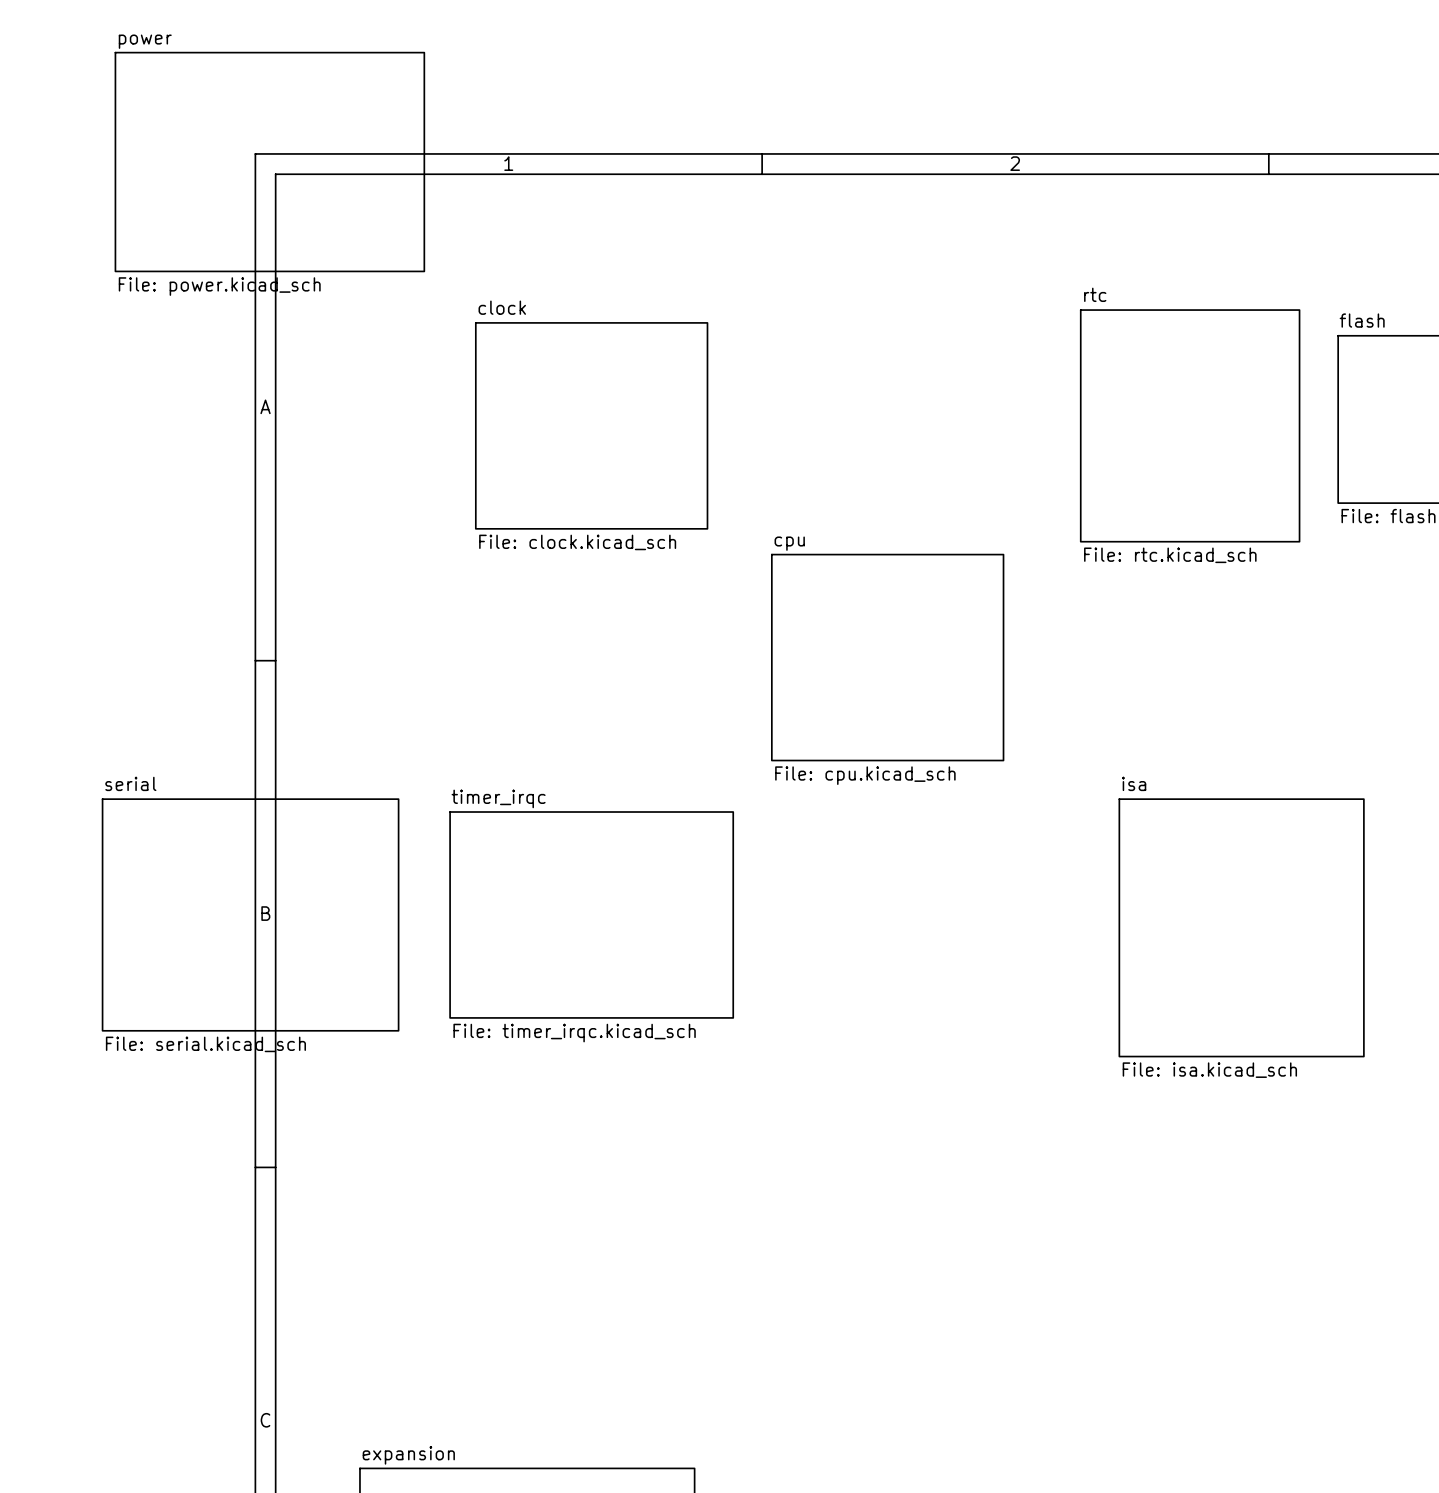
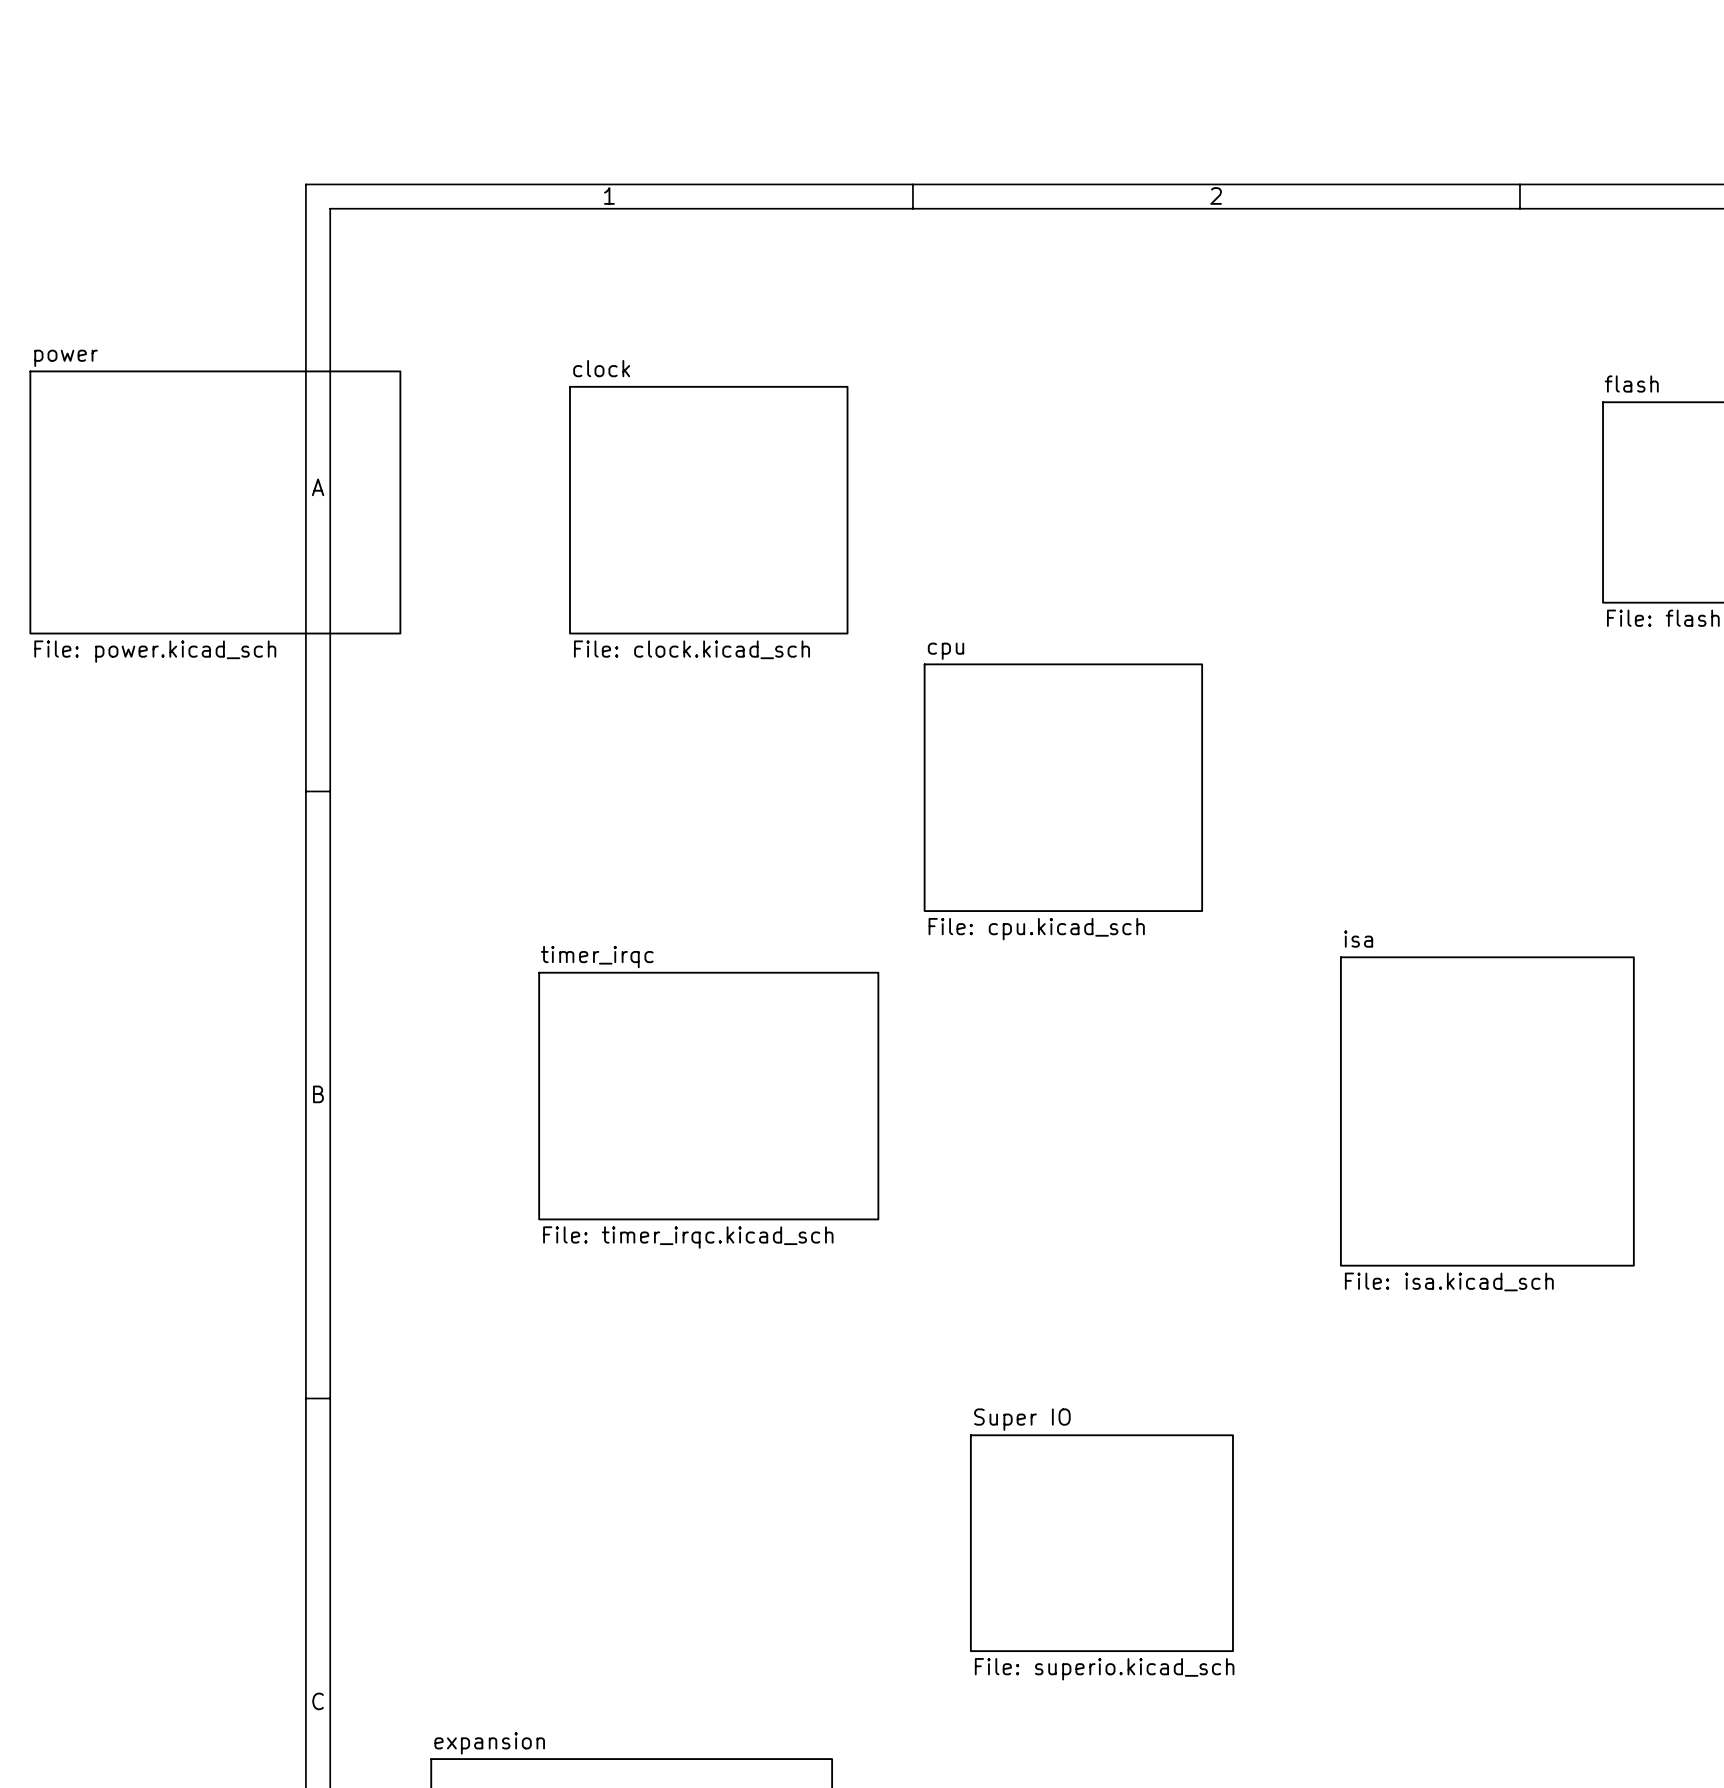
sheet power: File: power.kicad_sch (269, 162) -> none
sheet power: none -> File: power.kicad_sch (215, 502)
sheet rtc: File: rtc.kicad_sch (1190, 425) -> none
sheet serial: File: serial.kicad_sch (250, 914) -> none
sheet Super IO: none -> File: superio.kicad_sch (1101, 1543)

